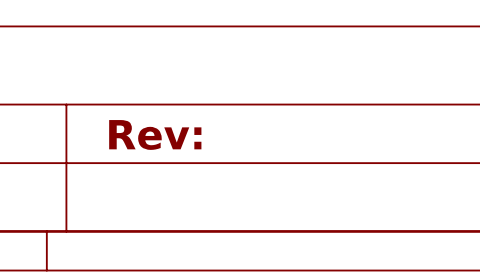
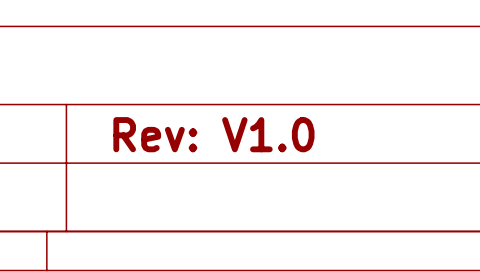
title block: Rev: (155, 134) -> Rev: V1.0 (213, 134)

